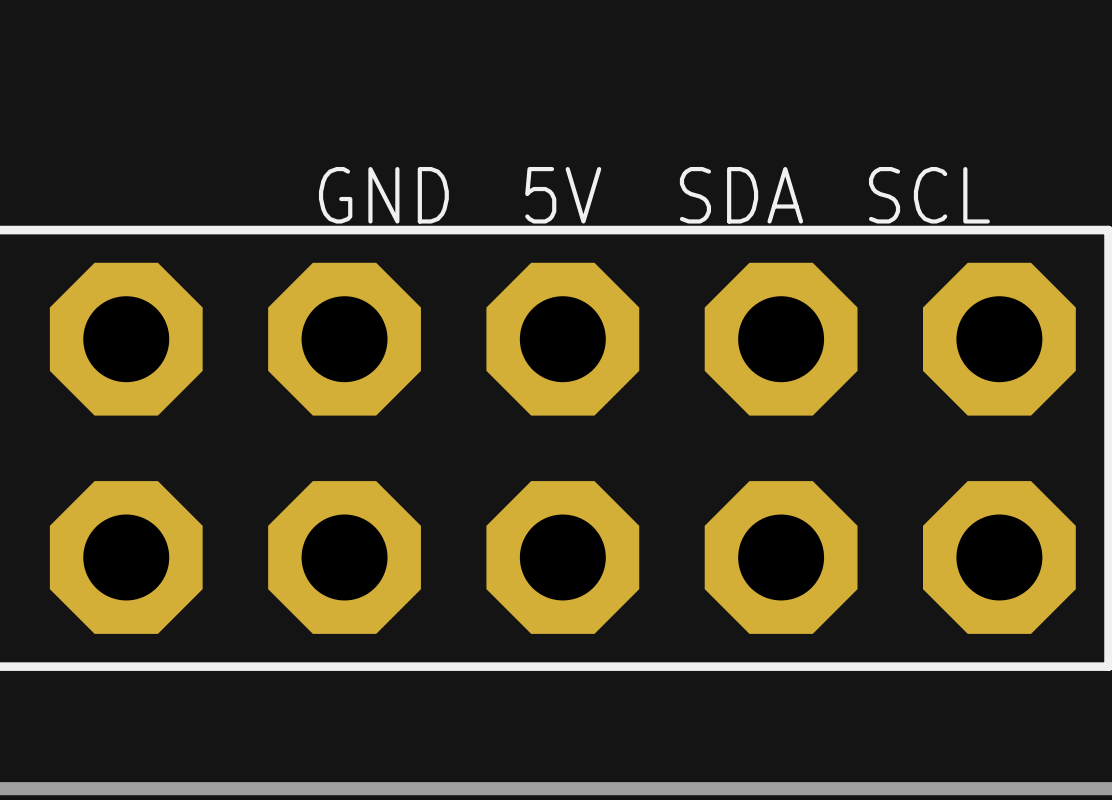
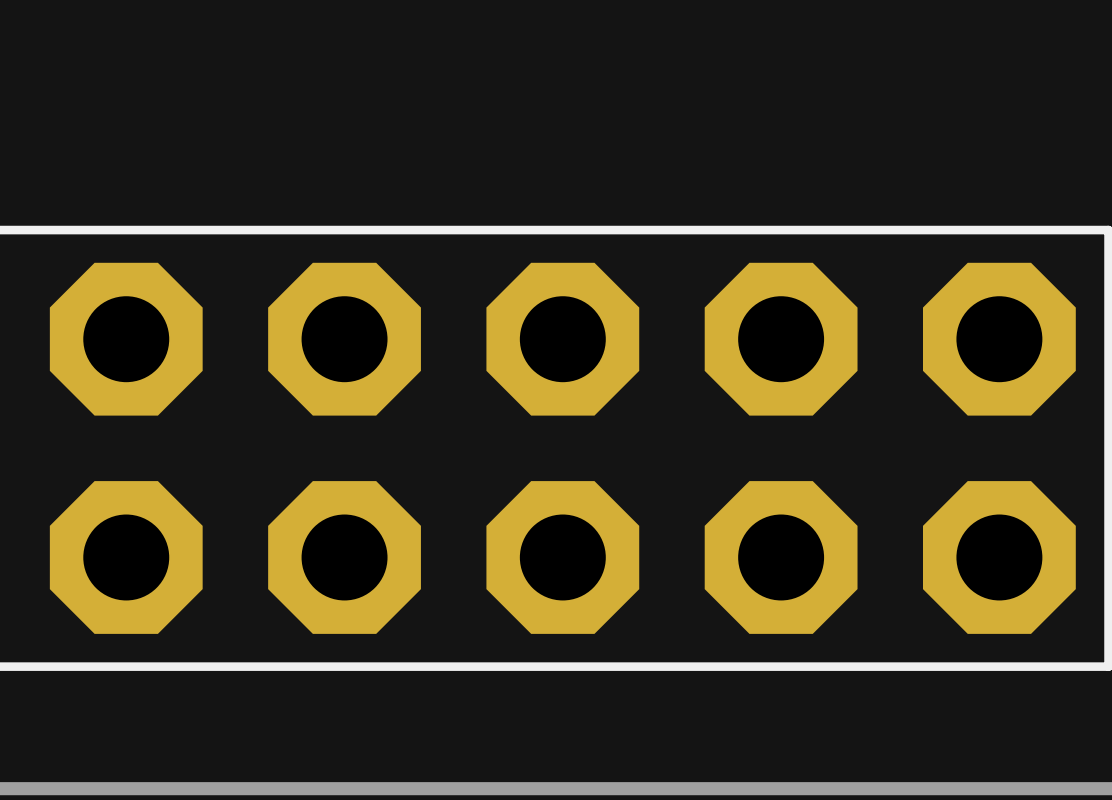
text: GND (383, 195) -> none
text: 5V (563, 195) -> none
text: SDA (741, 195) -> none
text: SCL (929, 195) -> none

